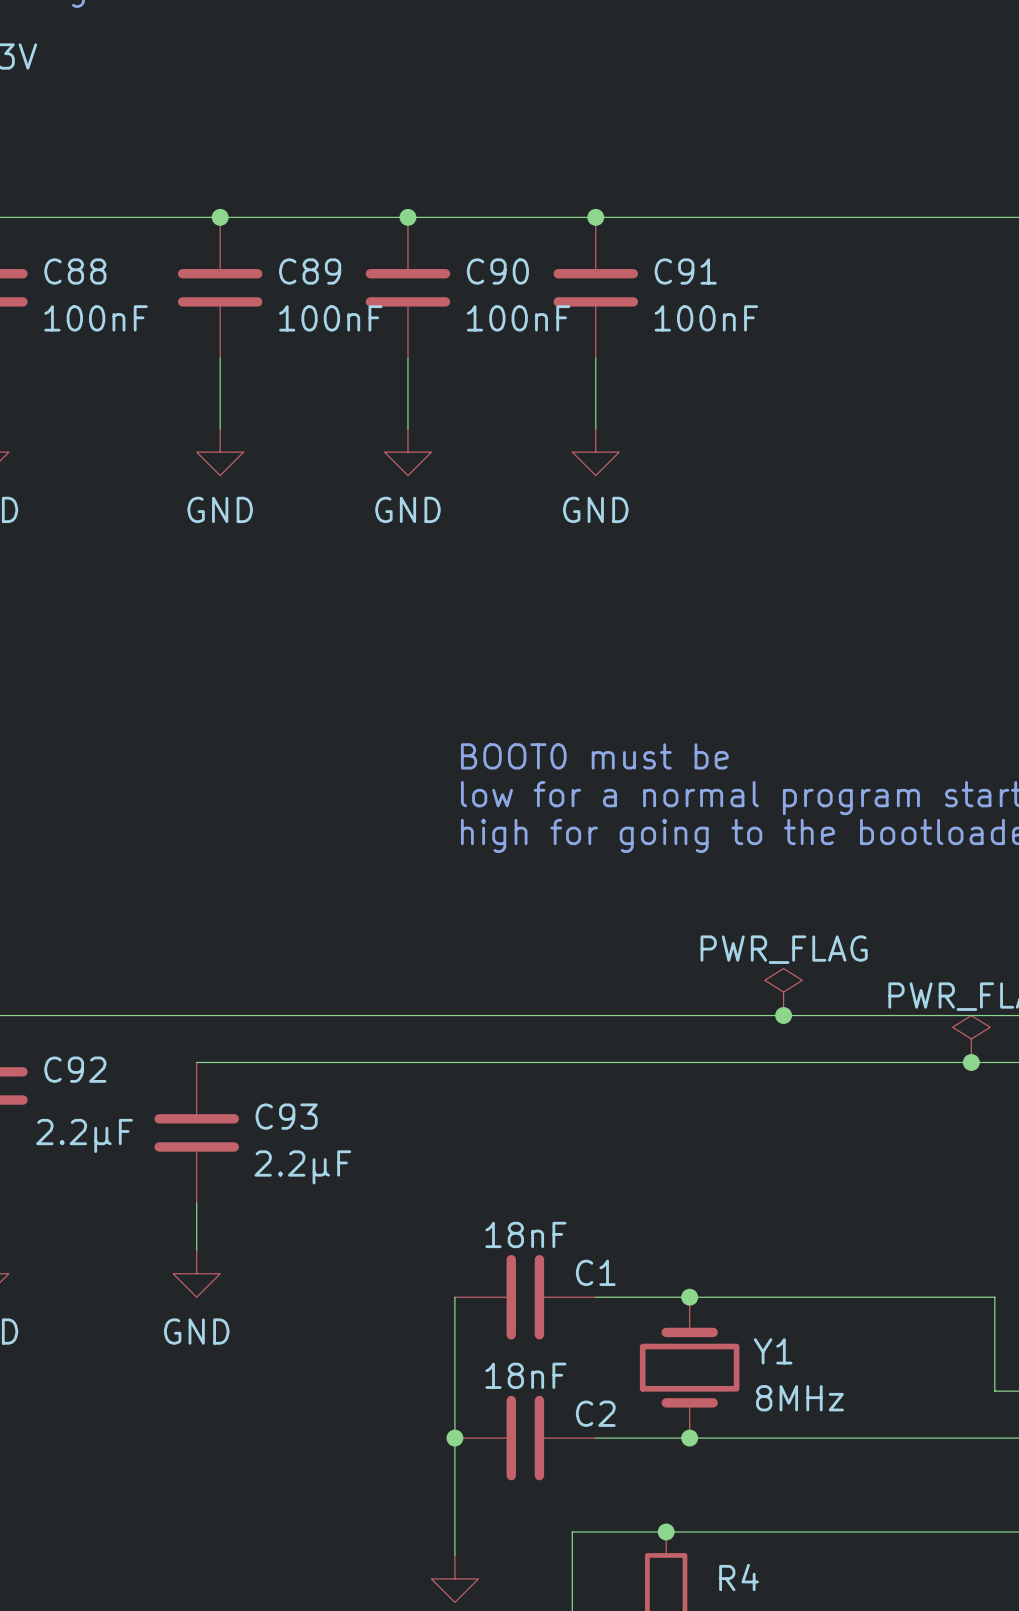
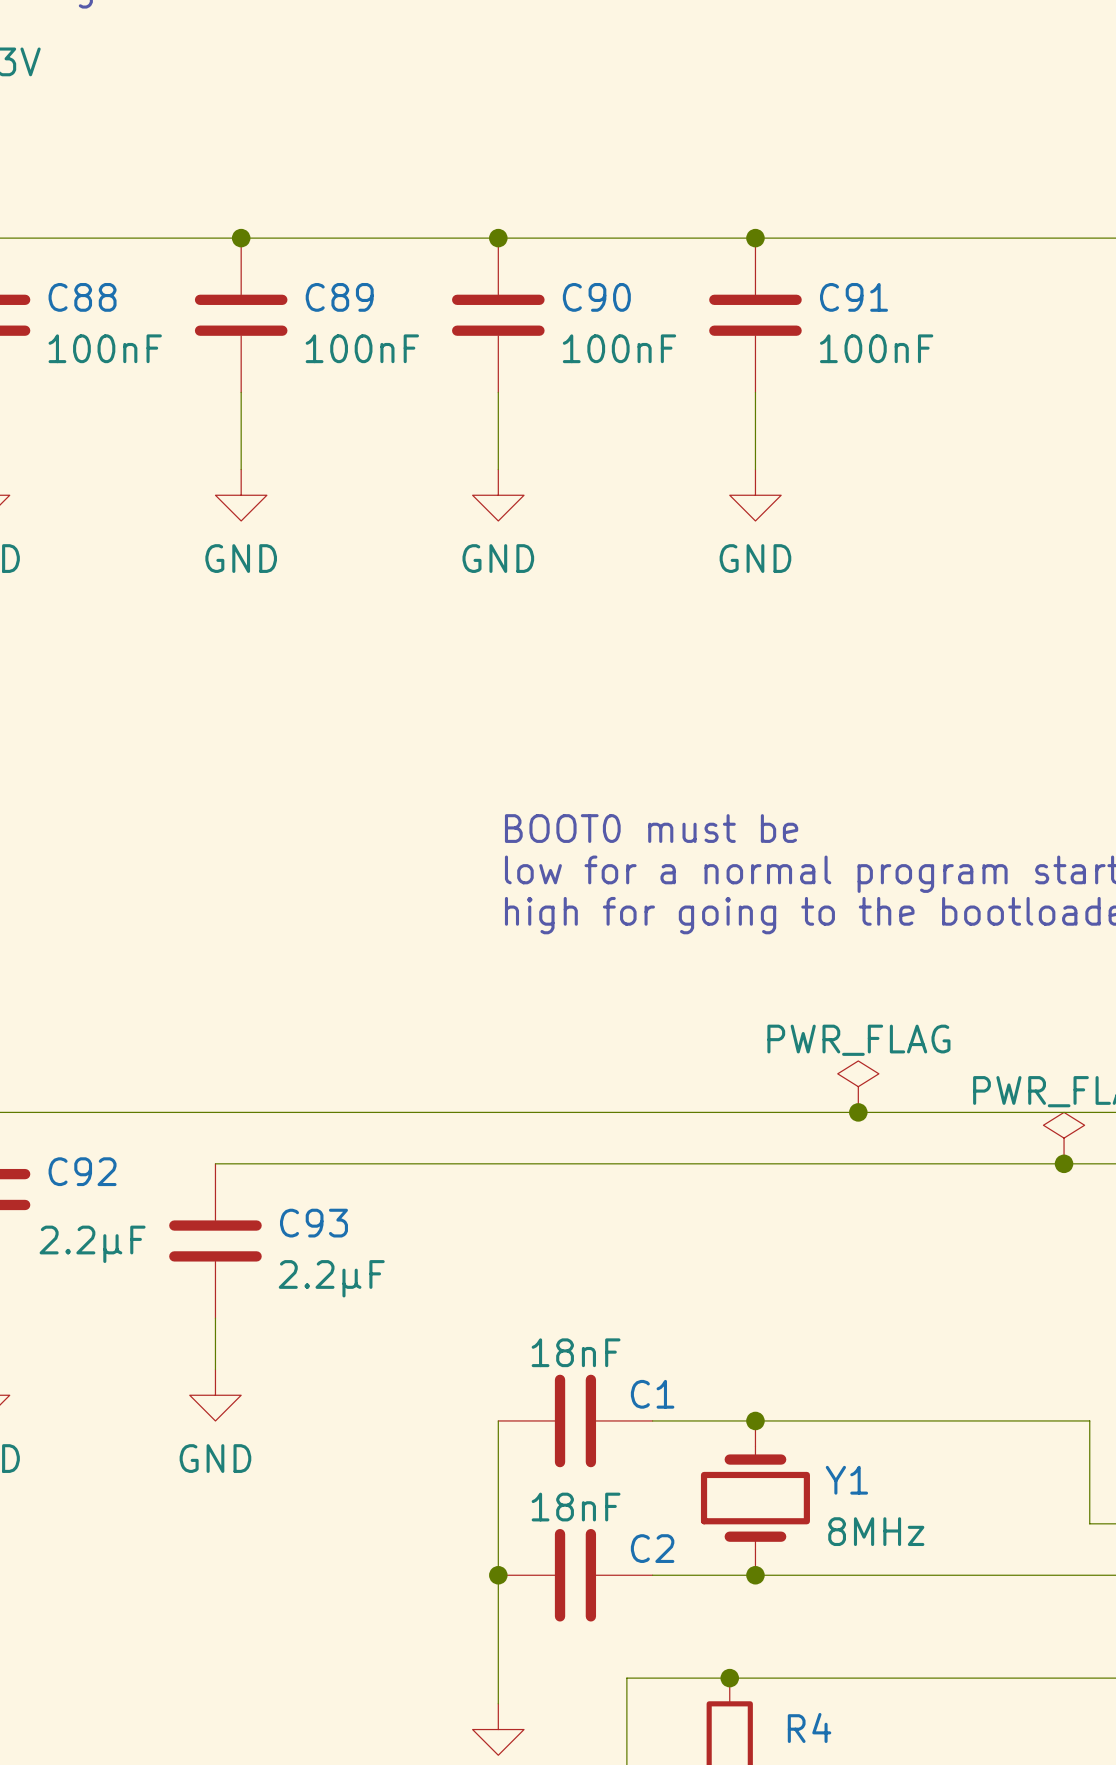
junction position: (407, 217) -> (498, 238)
junction: (595, 217) -> none
junction: none -> (755, 238)
C90 position: (407, 287) -> (498, 315)
C91 position: (595, 287) -> (755, 315)
wire: (407, 358) (407, 428) -> (498, 392) (498, 469)
wire: (595, 358) (595, 428) -> (755, 392) (755, 469)
power symbol position: GND (407, 452) -> GND (498, 495)
power symbol: GND (595, 452) -> none
power symbol: none -> GND (755, 495)

